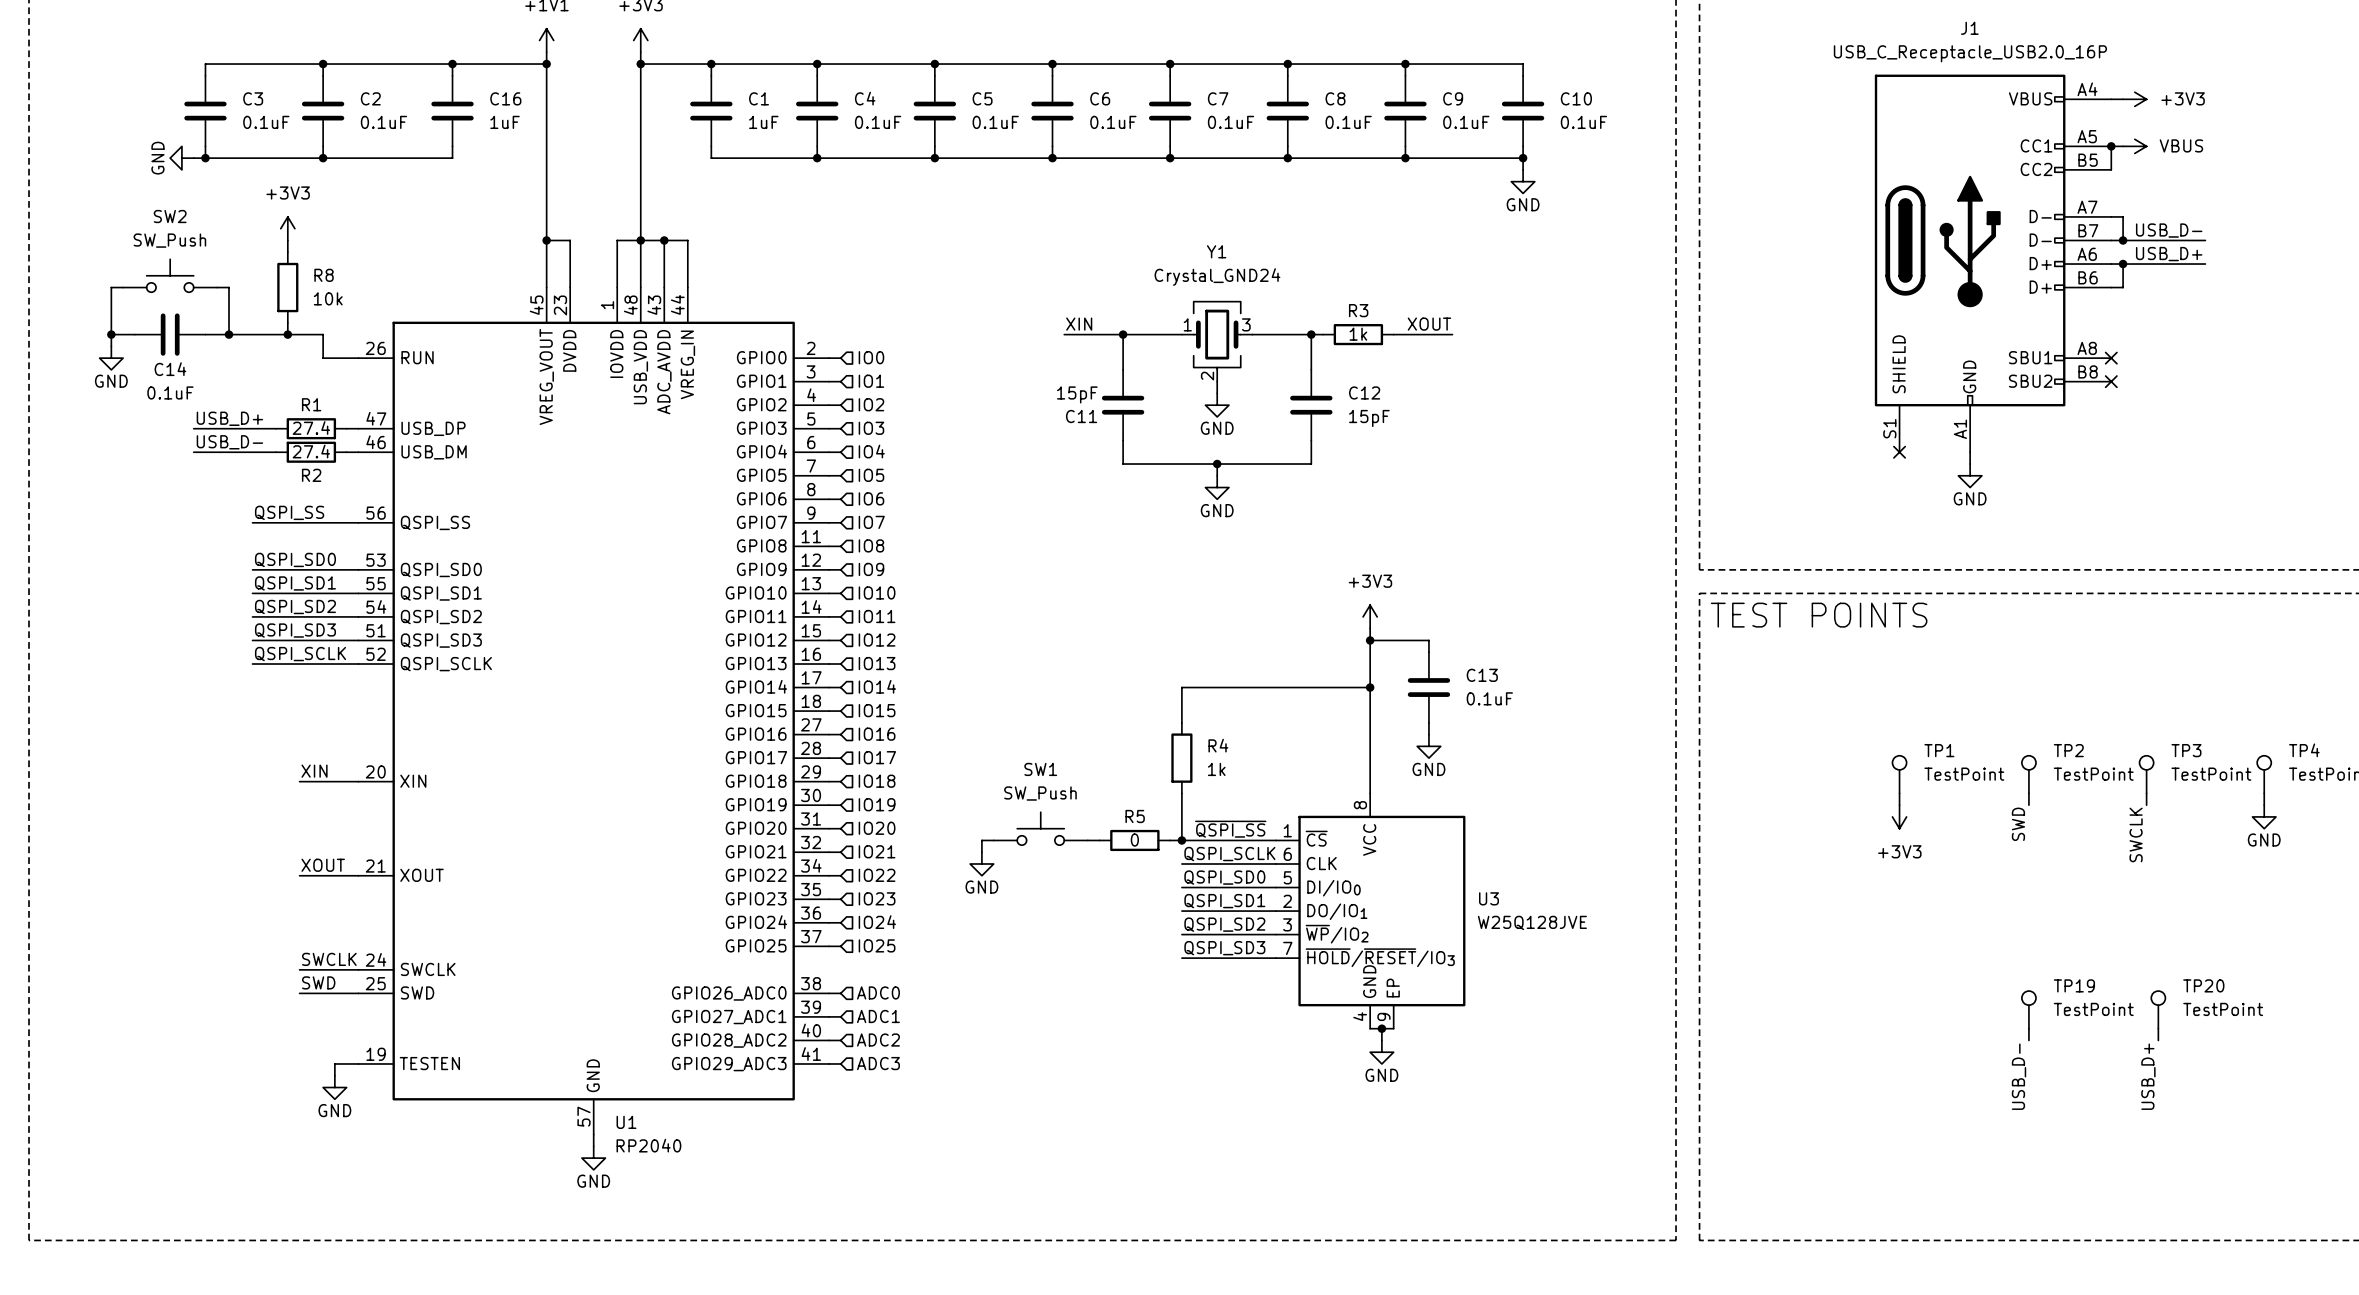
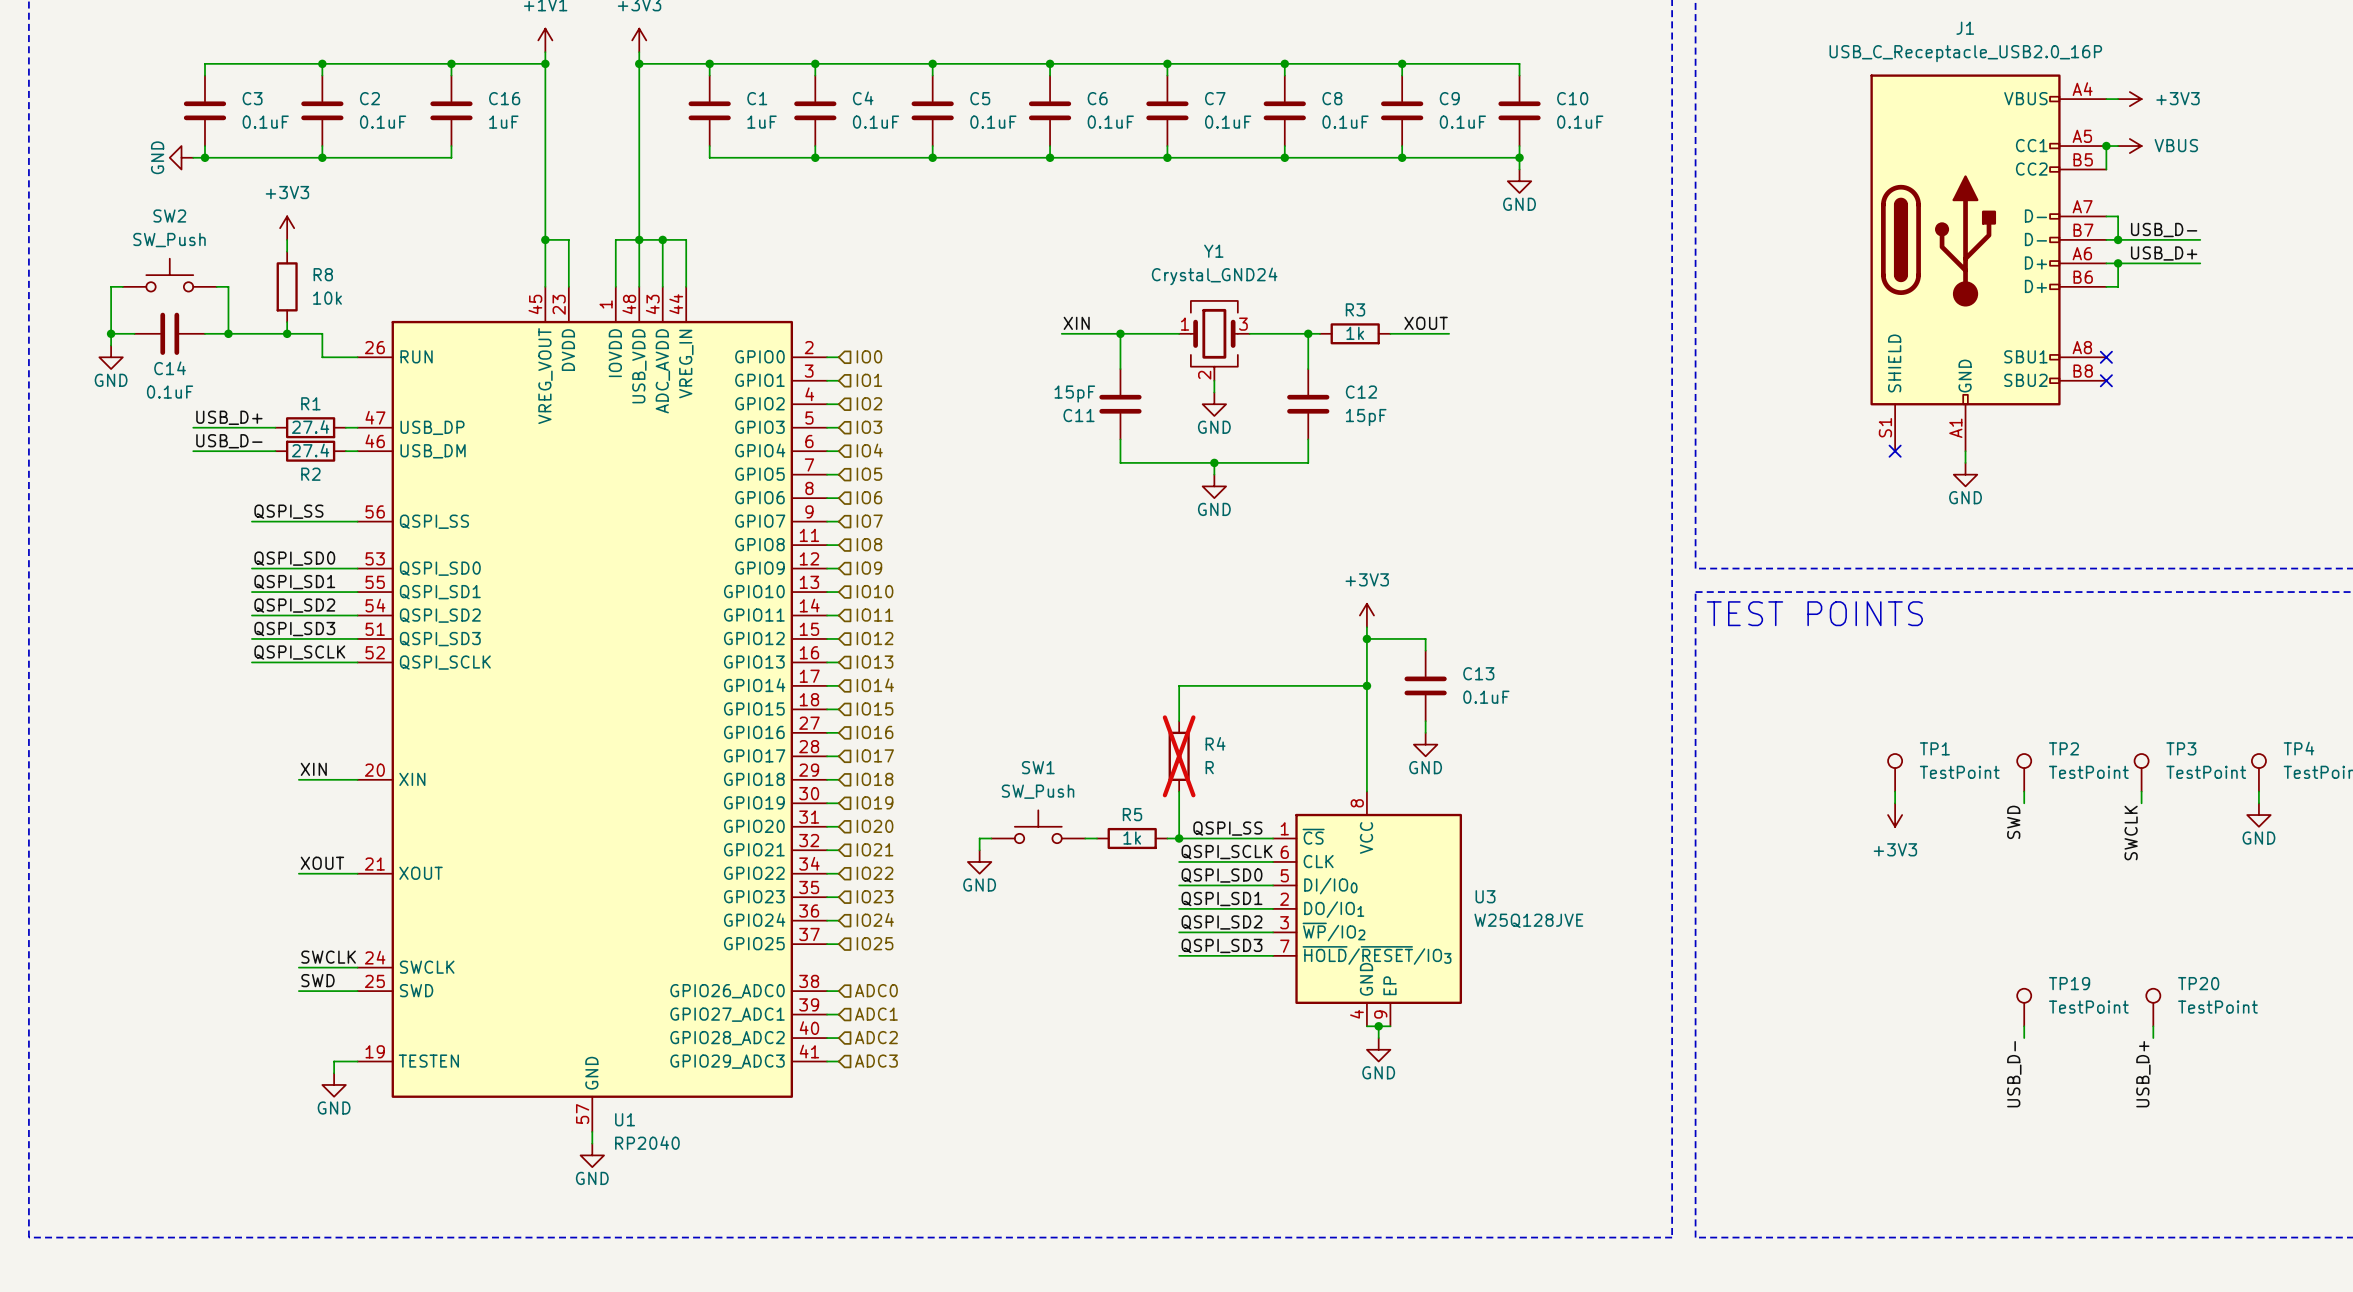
R4 do-not-place cross: none -> (1179, 756)
R4 value: 1k (1216, 769) -> R (1209, 767)
label: ~{QSPI_SS} (1230, 829) -> QSPI_SS (1227, 828)
R5 value: 0 (1134, 840) -> 1k (1132, 838)

